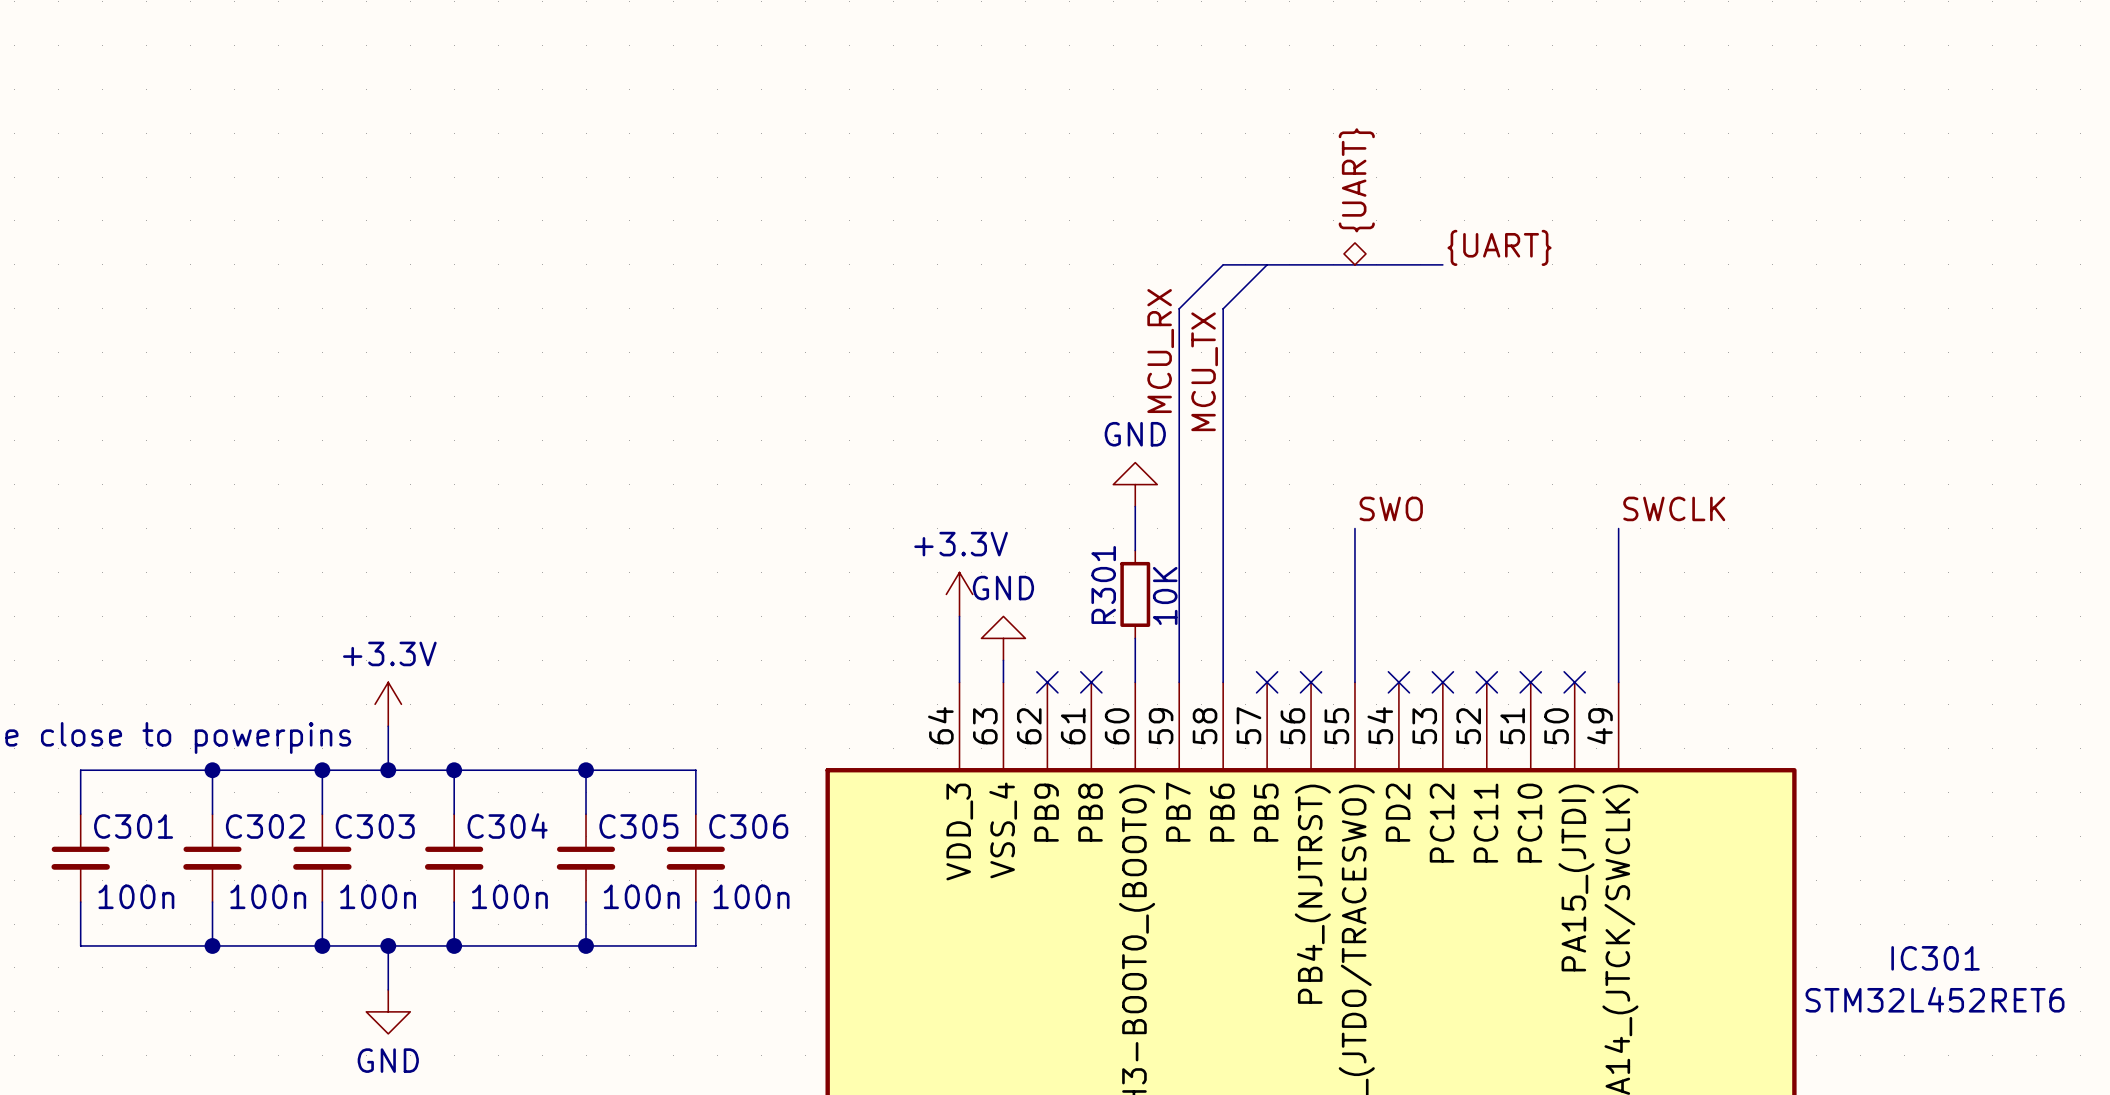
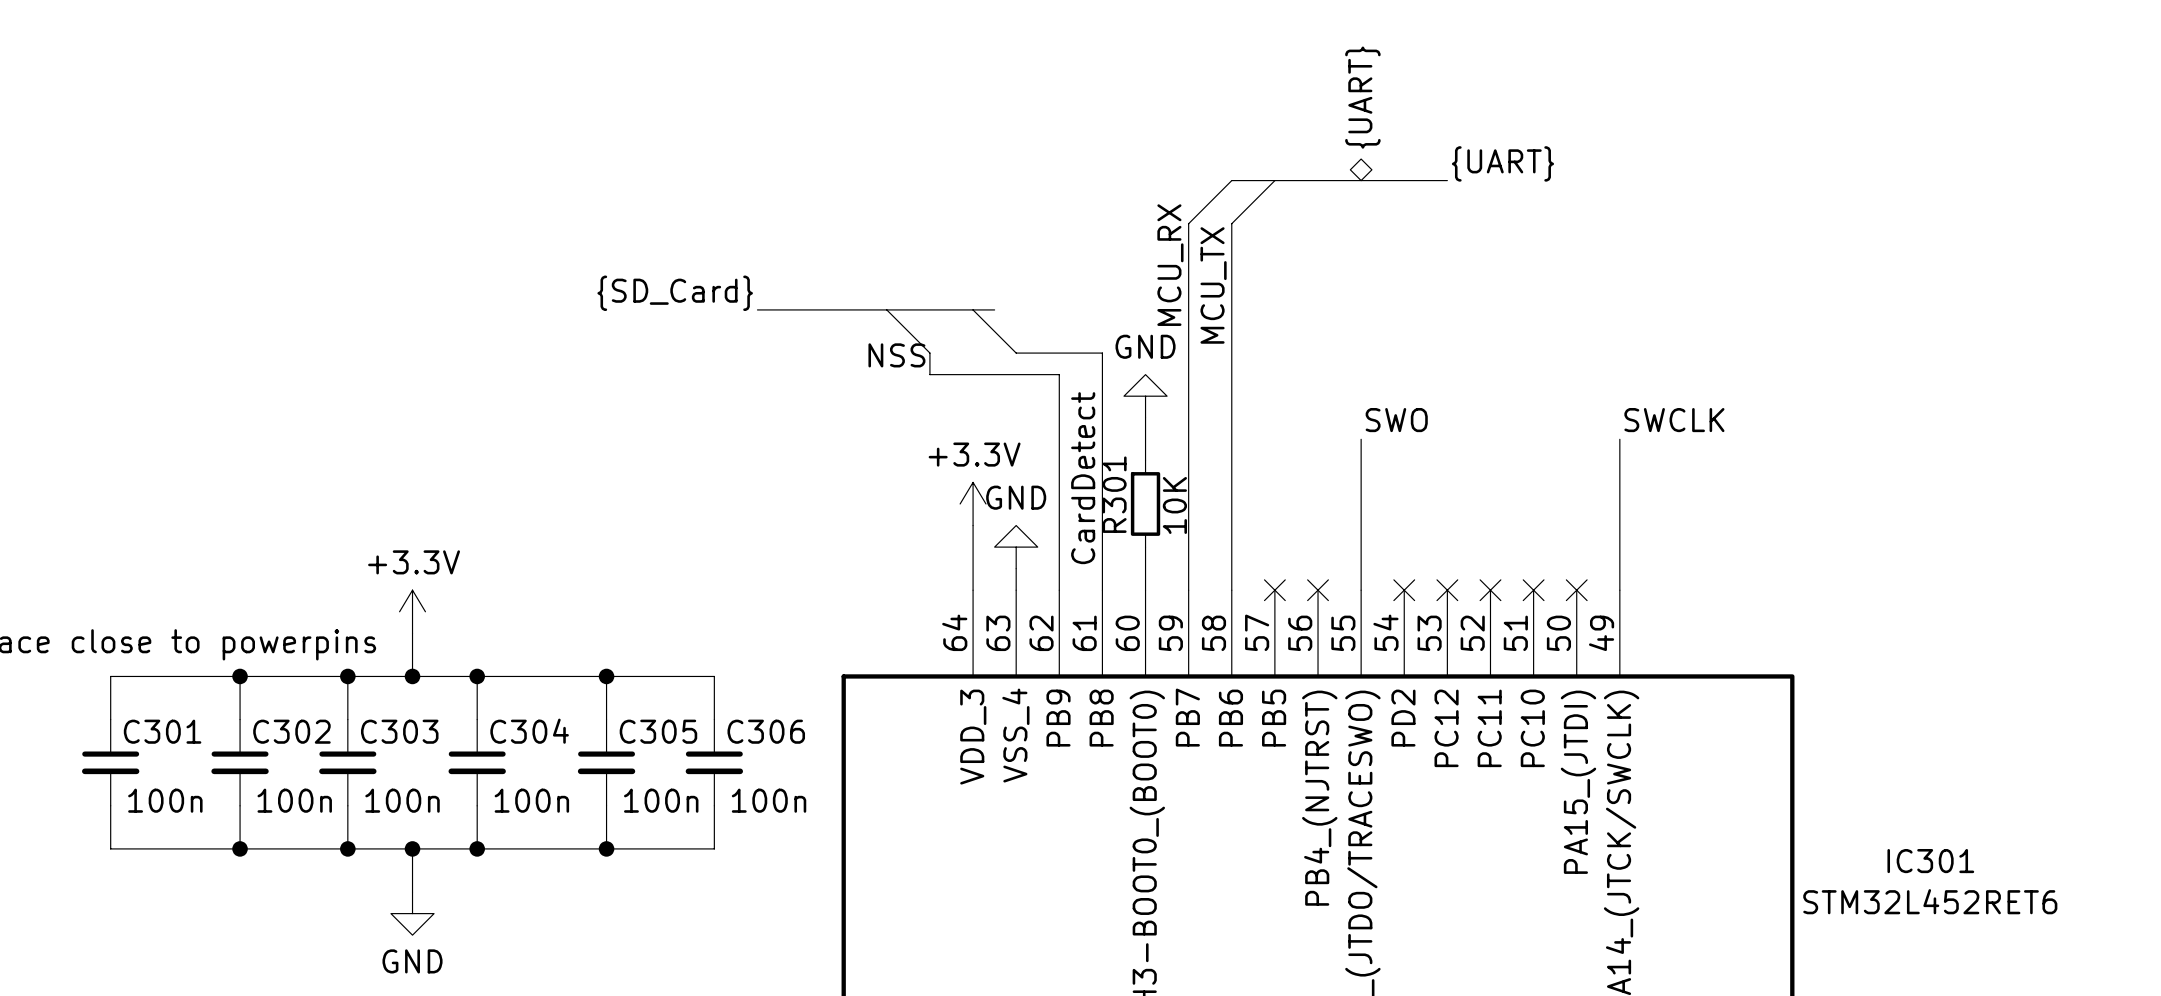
label: none -> {SD_Card} (675, 293)
bus: none -> (757, 309) (994, 309)
wire: none -> (886, 309) (929, 353) (929, 374) (1059, 374) (1059, 590)
wire: none -> (973, 309) (1016, 353) (1102, 353) (1102, 590)
label: none -> NSS (896, 355)
label: none -> CardDetect (1083, 478)
no-connect mark: (1047, 682) -> none
no-connect mark: (1091, 682) -> none

